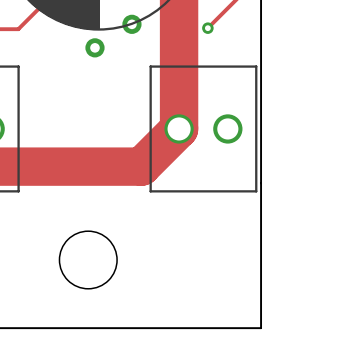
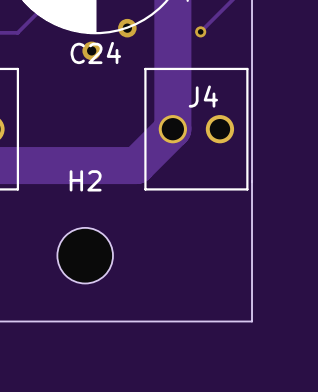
C24 name: none -> C24 (95, 52)
J4 name: none -> J4 (203, 96)
H2 name: none -> H2 (85, 180)

